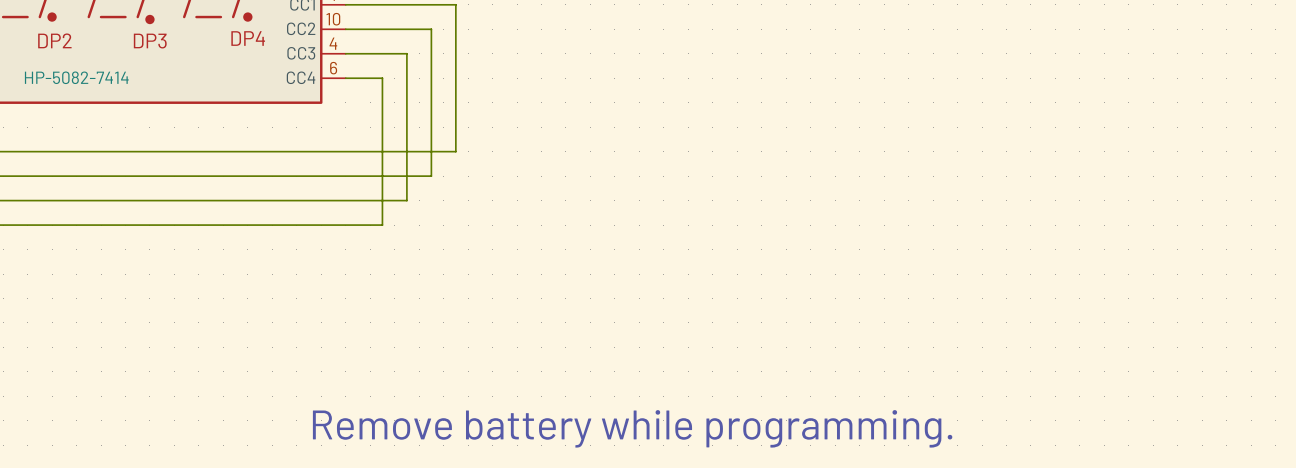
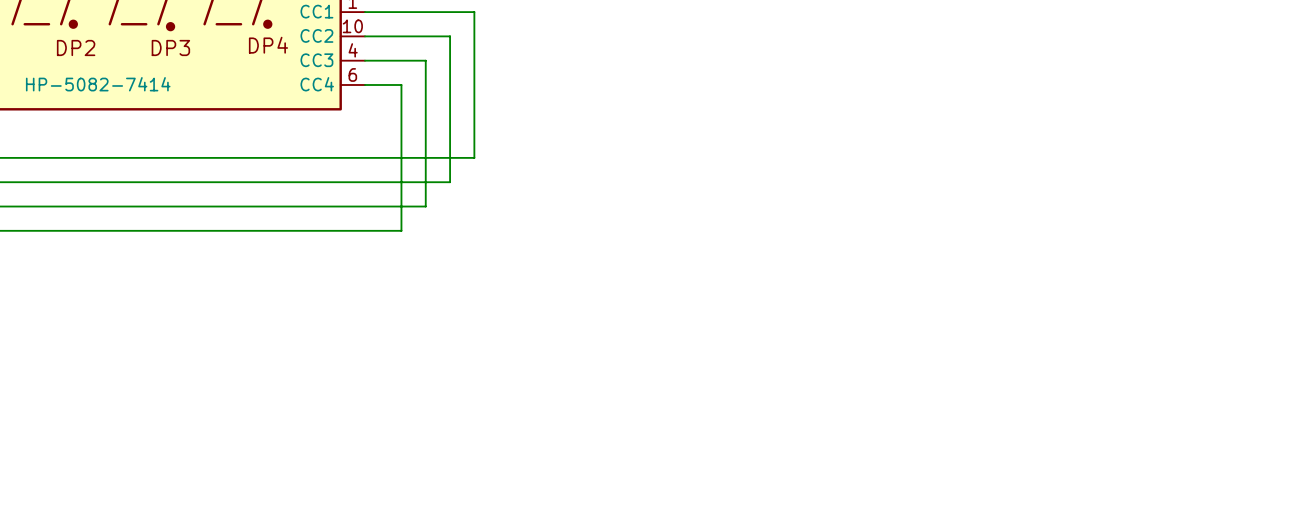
text: Remove battery while programming. (632, 428) -> none

